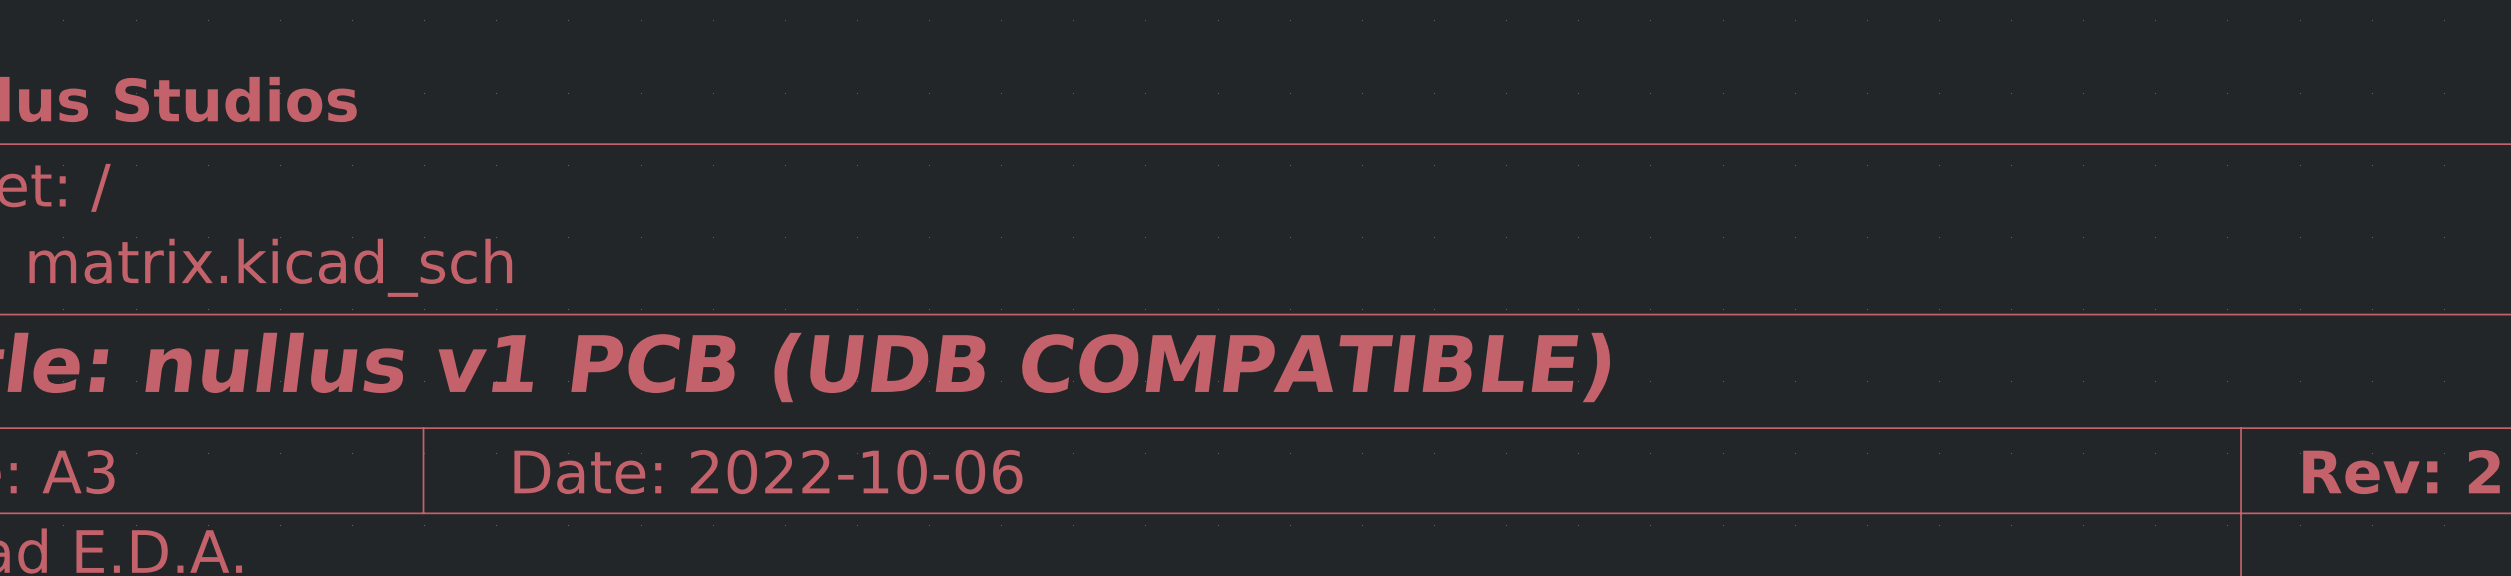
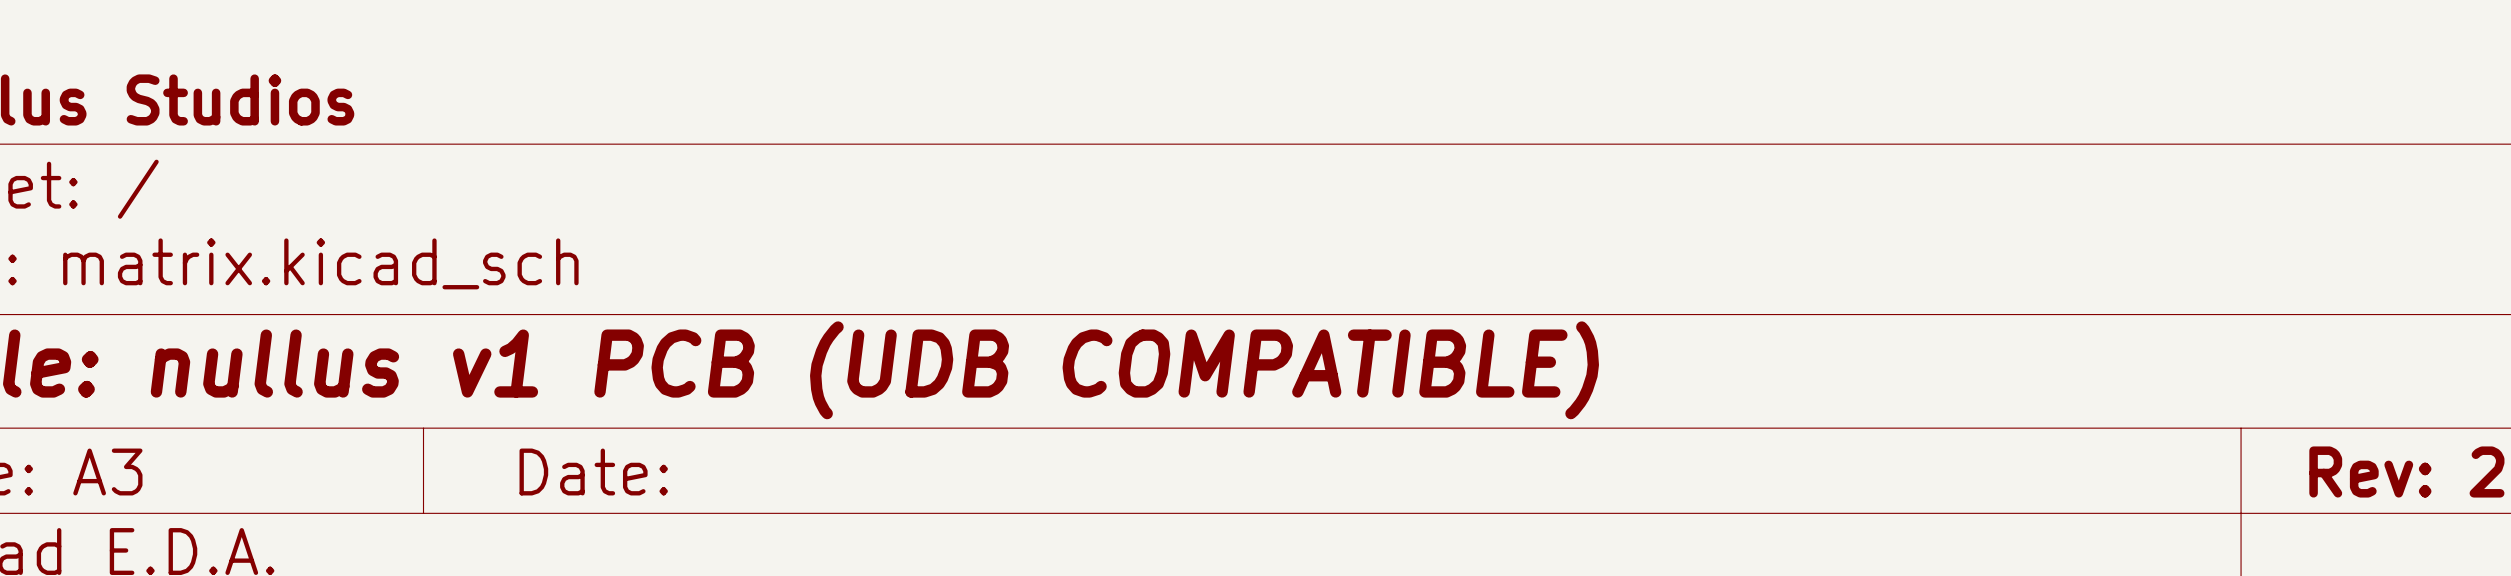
title block: Date: 2022-10-06 (768, 472) -> Date: (593, 472)

